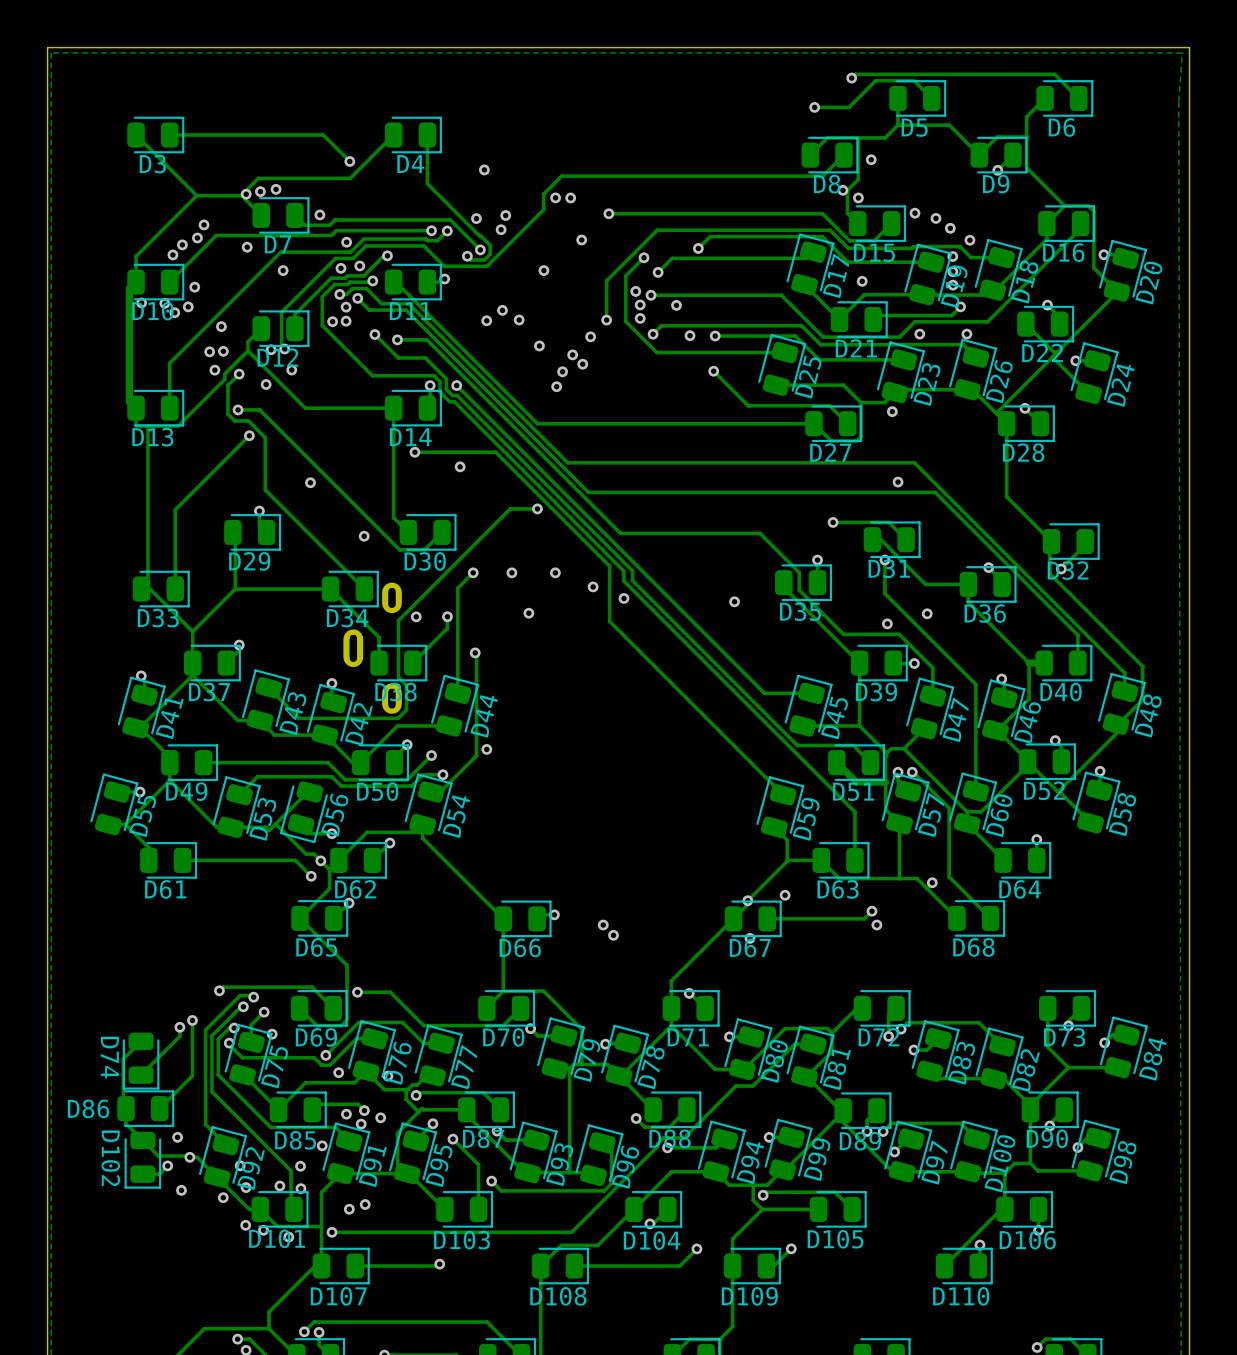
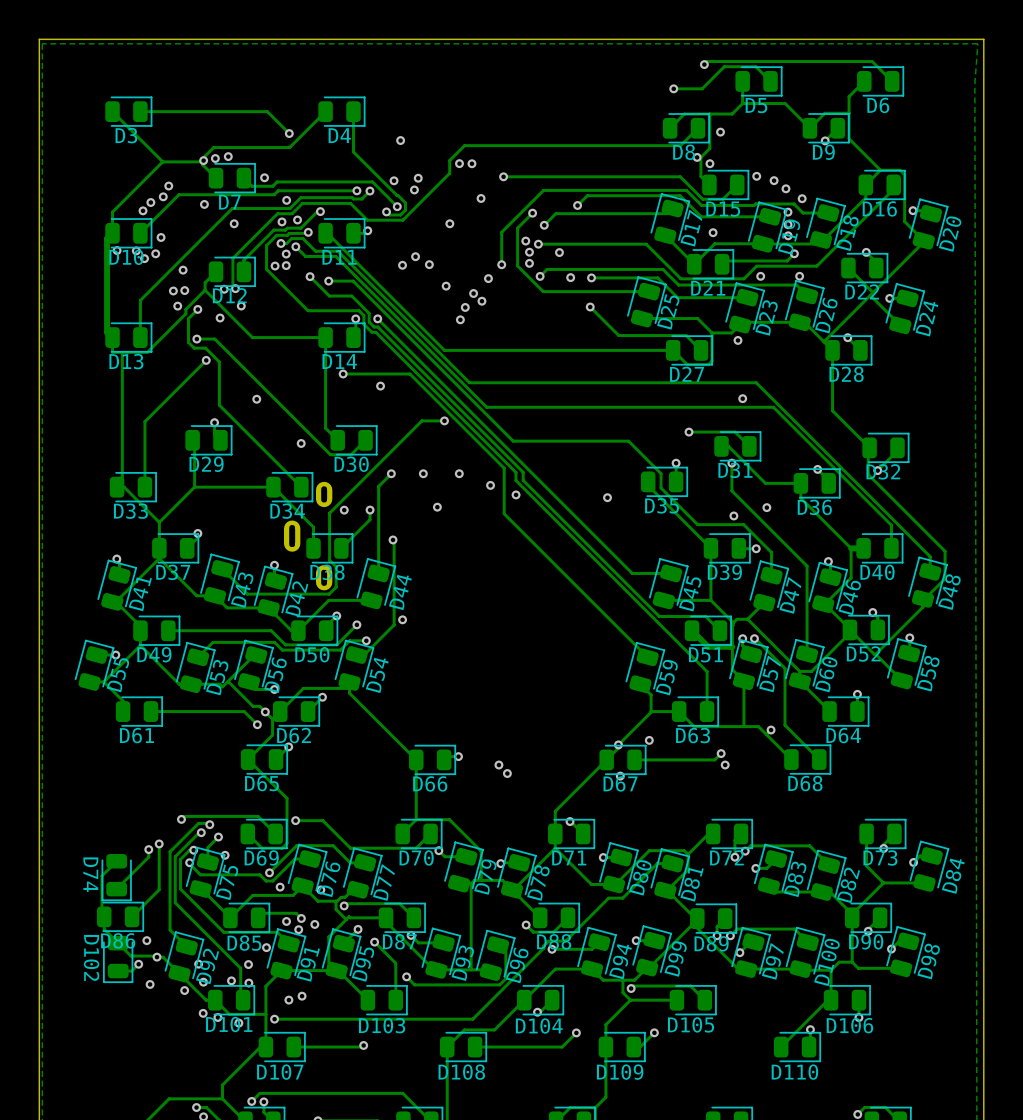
D56 rotation: 0° (303, 812) -> 180° (253, 665)
D86 name position: D86 (88, 1108) -> D86 (118, 940)

